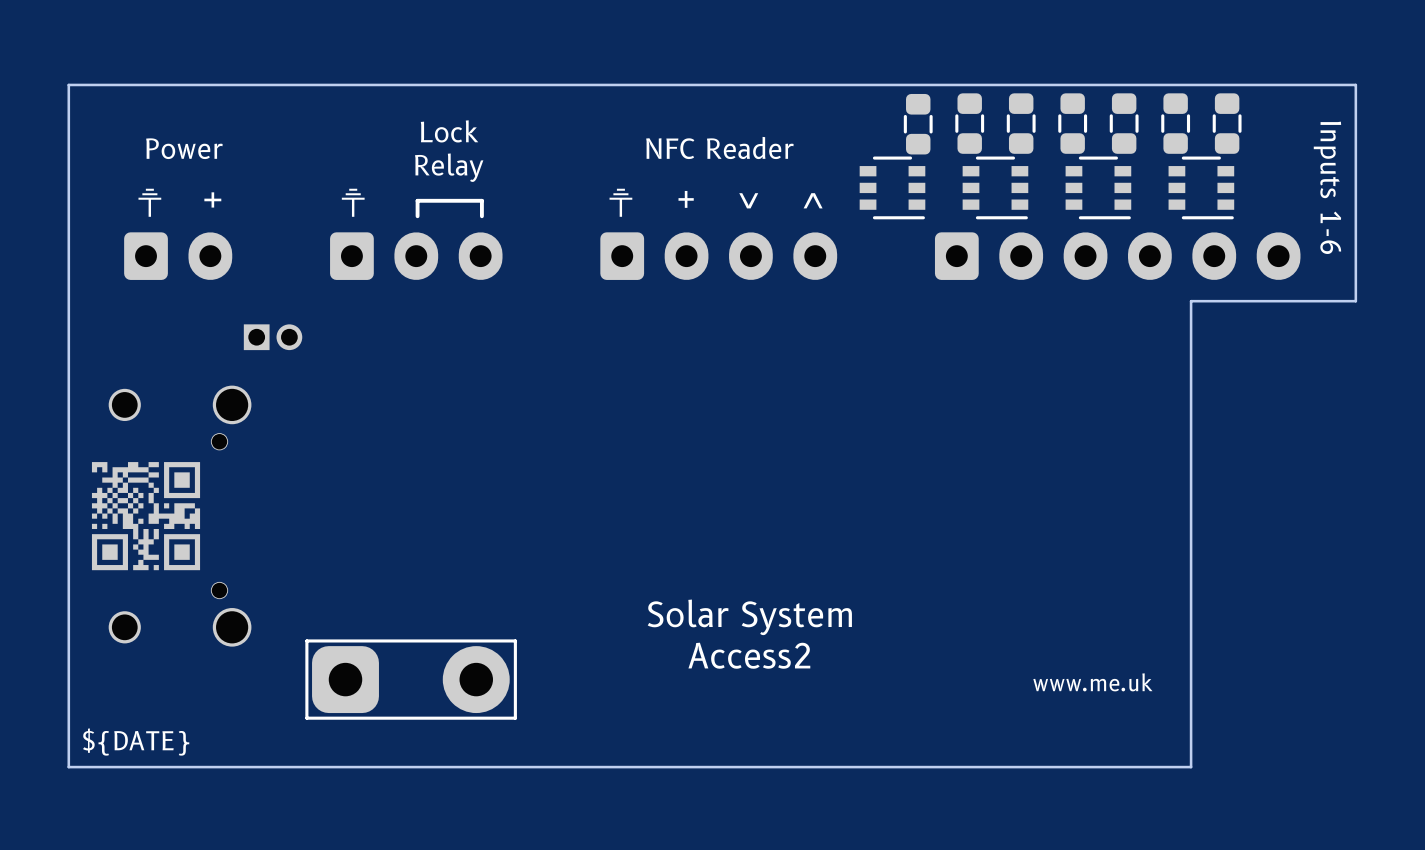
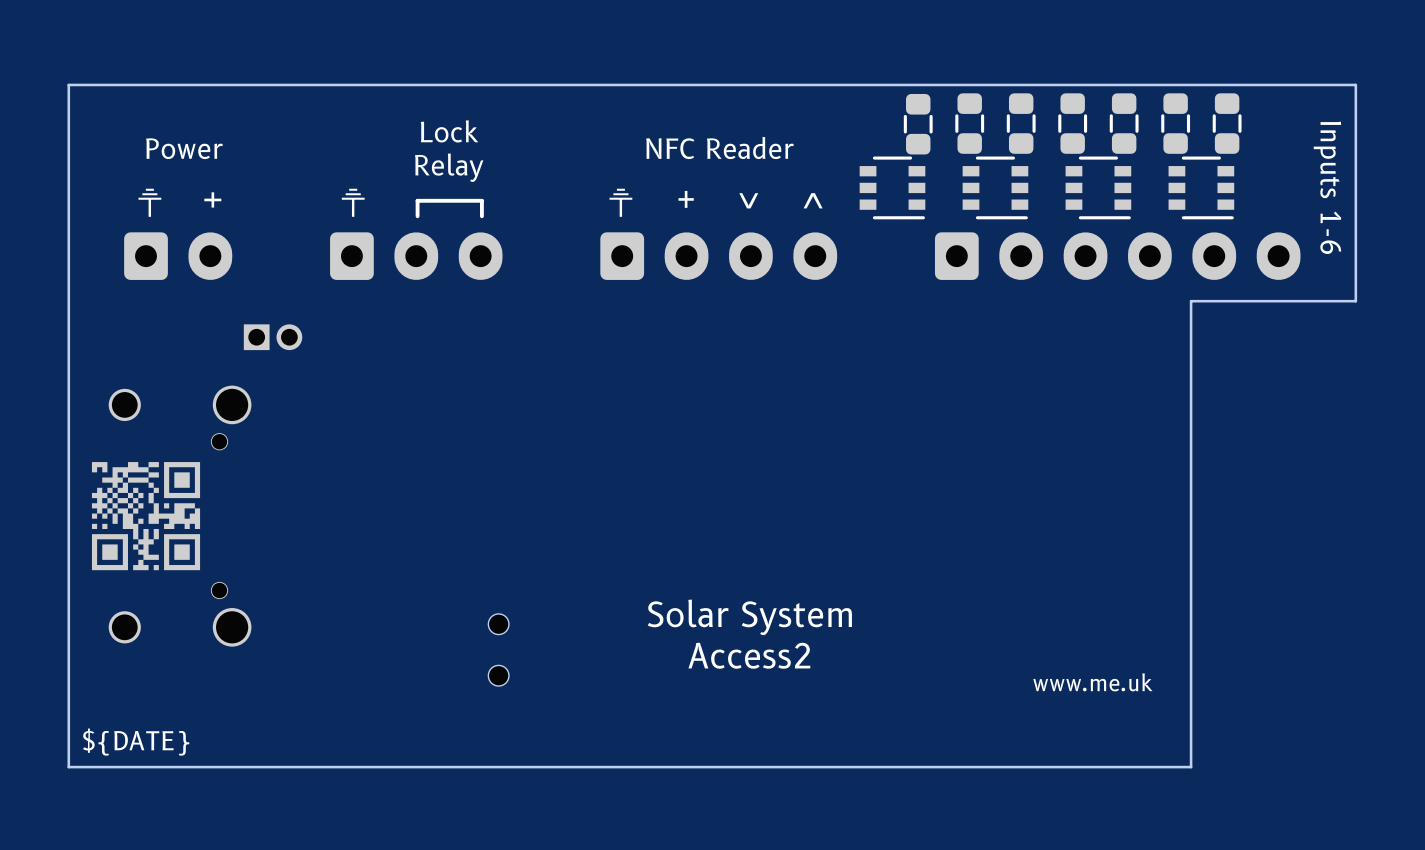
part: none -> (498, 649)
part: (411, 679) -> none

